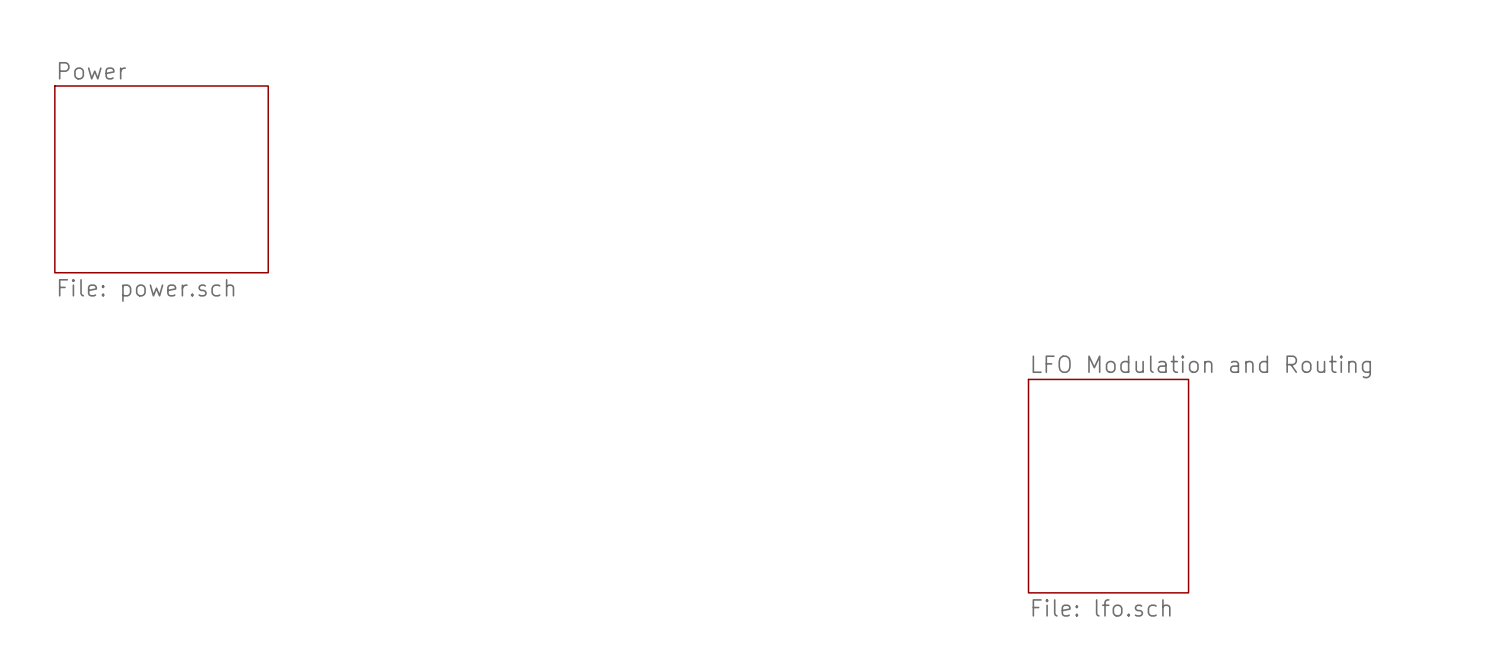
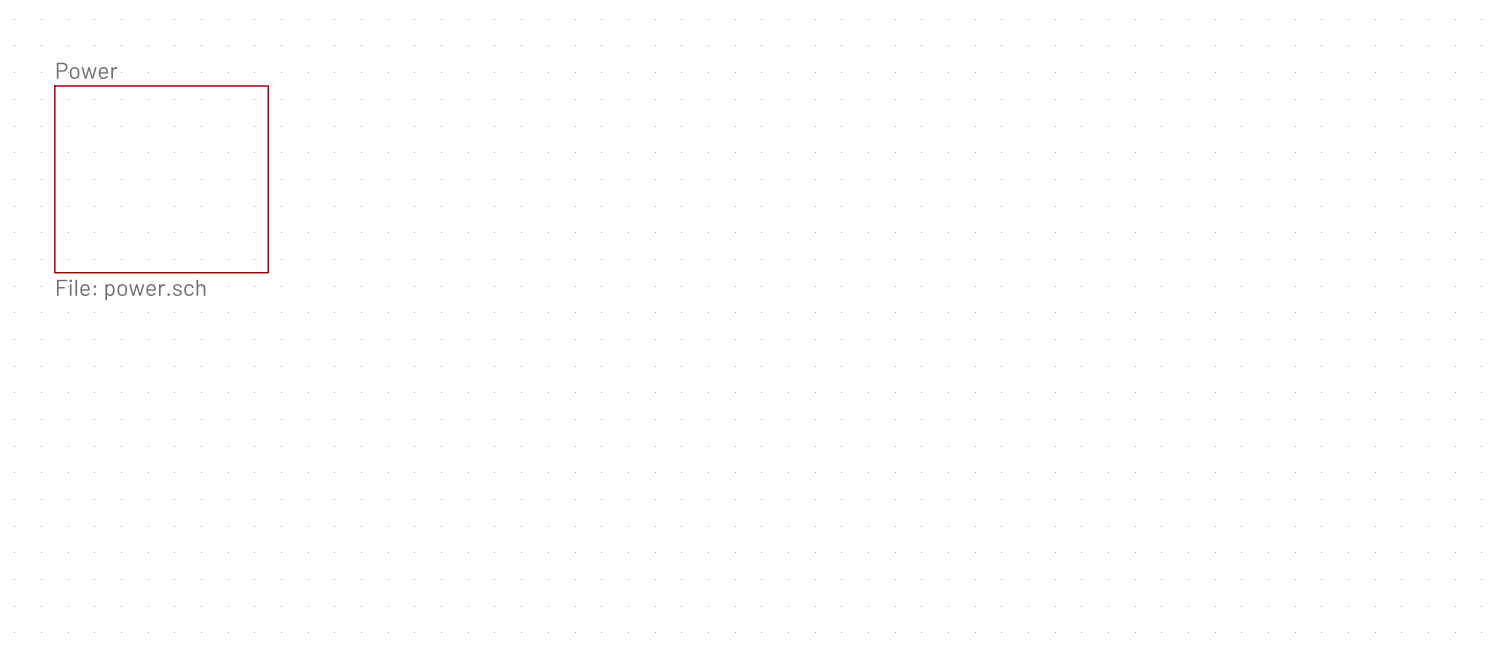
sheet LFO Modulation and Routing: File: lfo.sch (1108, 486) -> none

